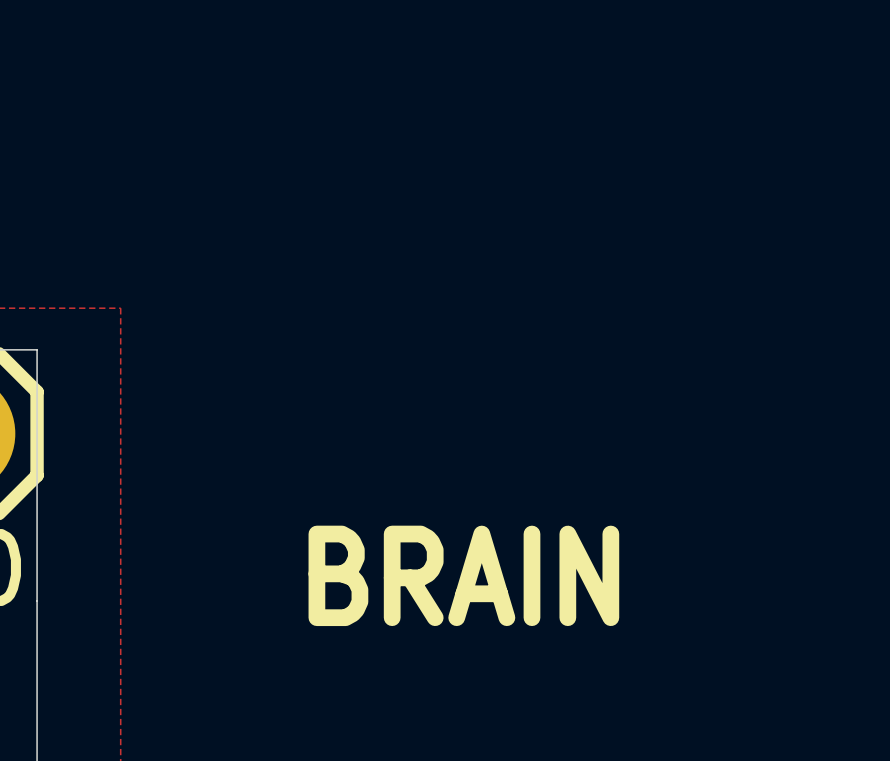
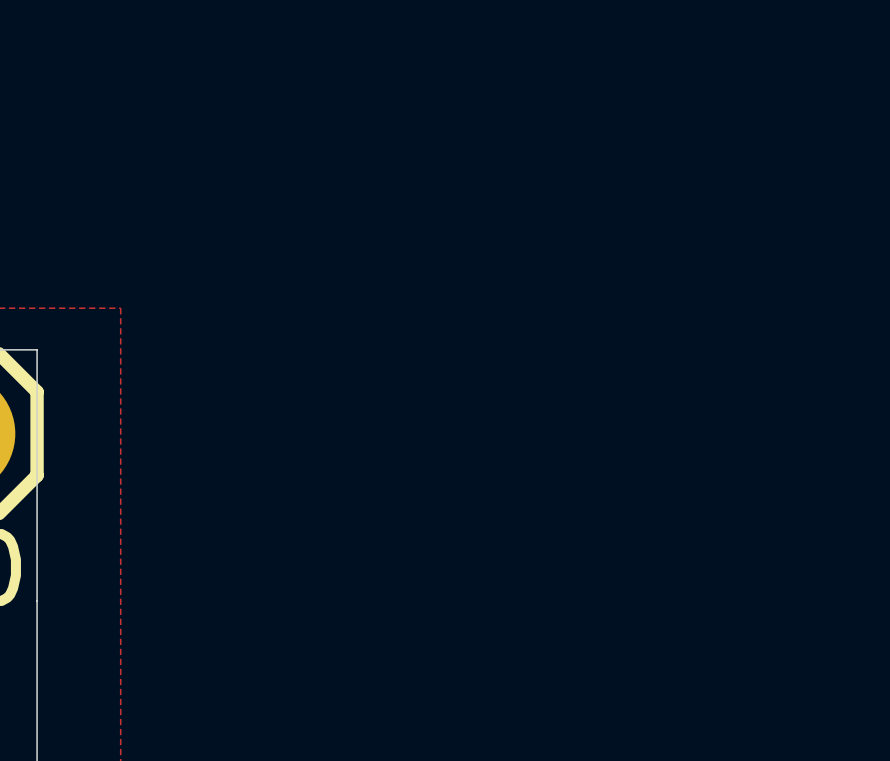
text: BRAIN (463, 575) -> none

